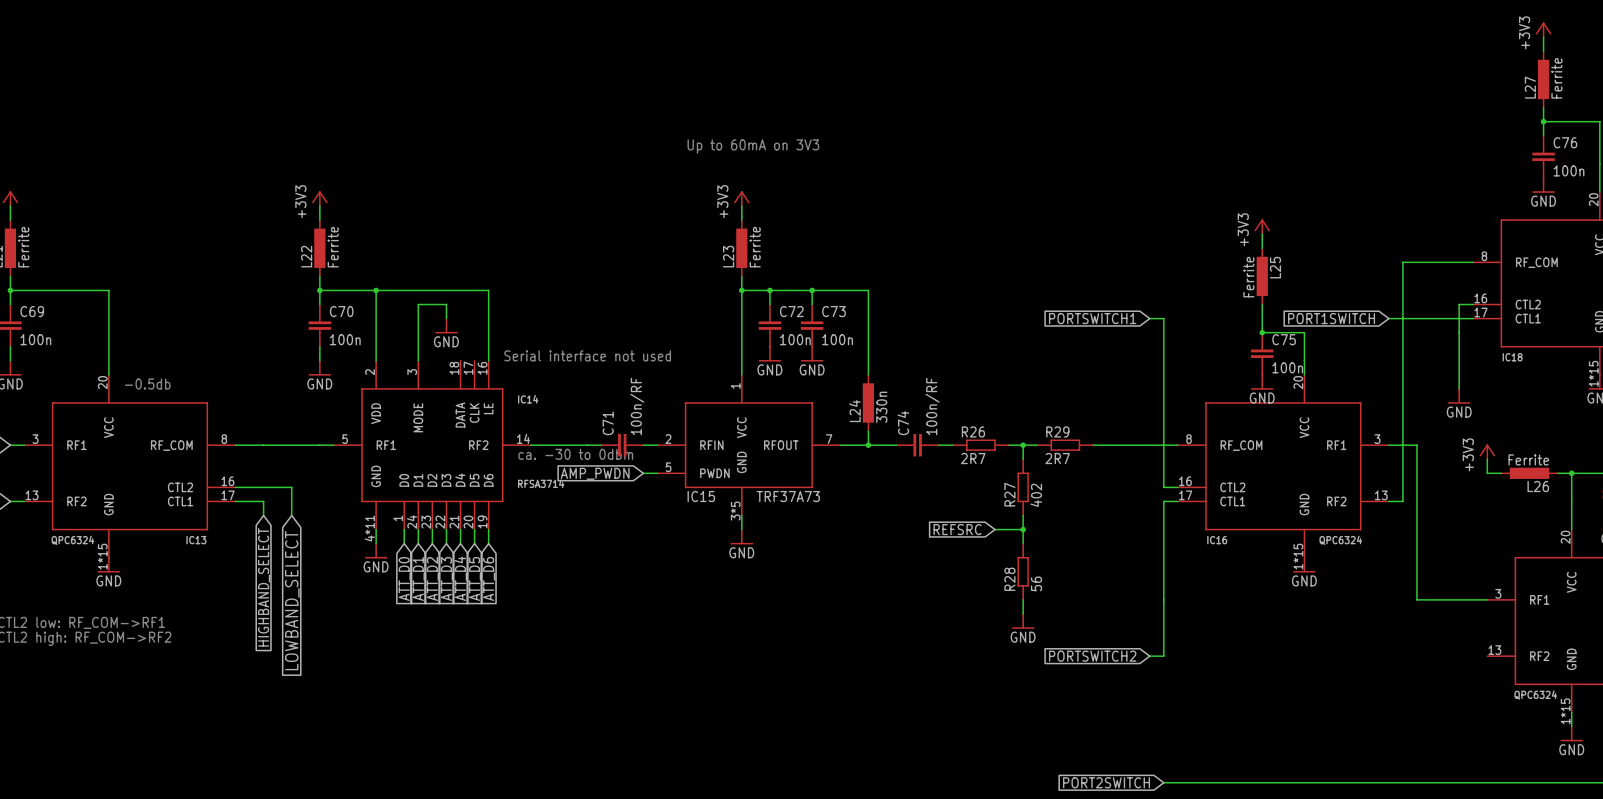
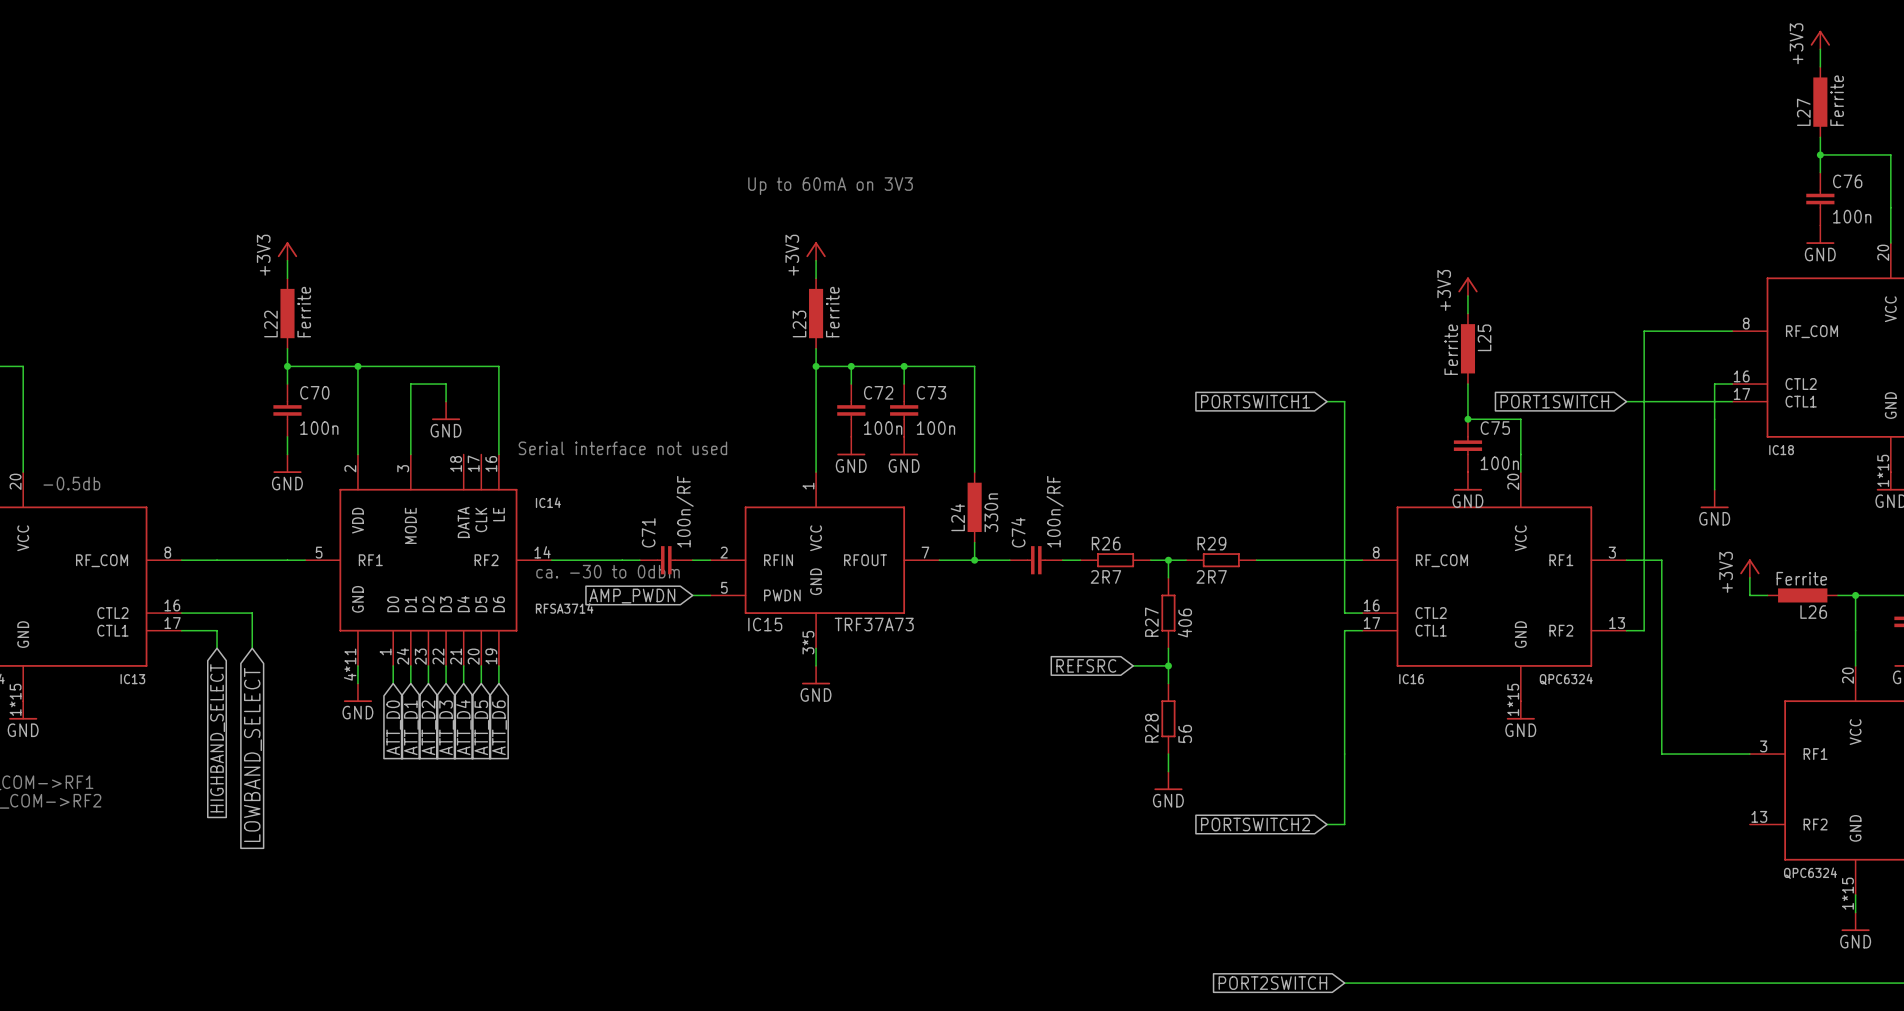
R27 value: 402 (1036, 495) -> 406 (1184, 622)

